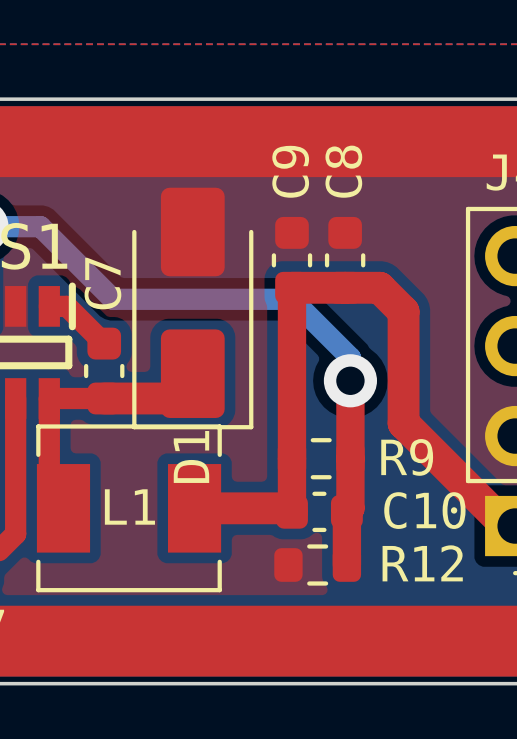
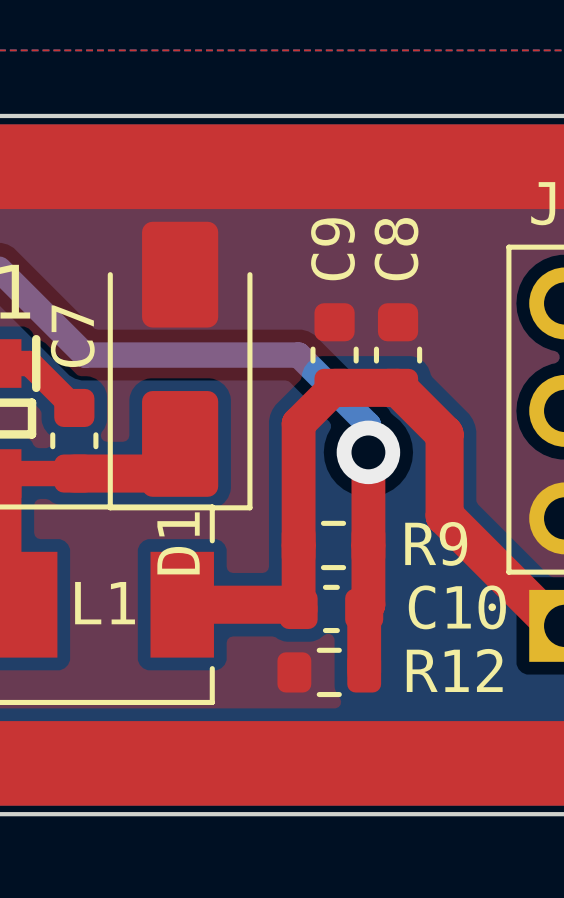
C9 position: (291, 260) -> (334, 355)
C8 position: (345, 260) -> (398, 355)
top track: (291, 356) (291, 287) (379, 287) (403, 311) (403, 423) (414, 433) -> (298, 423) (334, 387) (398, 387) (444, 434) (444, 515)

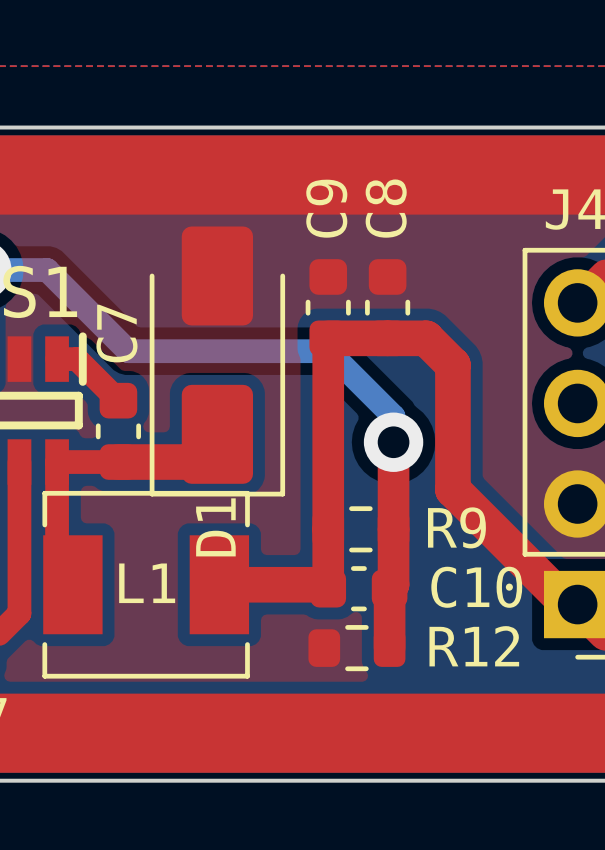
C9 position: (334, 355) -> (328, 307)
C8 position: (398, 355) -> (387, 307)
top track: (298, 423) (334, 387) (398, 387) (444, 434) (444, 515) -> (328, 415) (328, 338) (426, 338) (452, 365) (452, 489) (464, 501)

